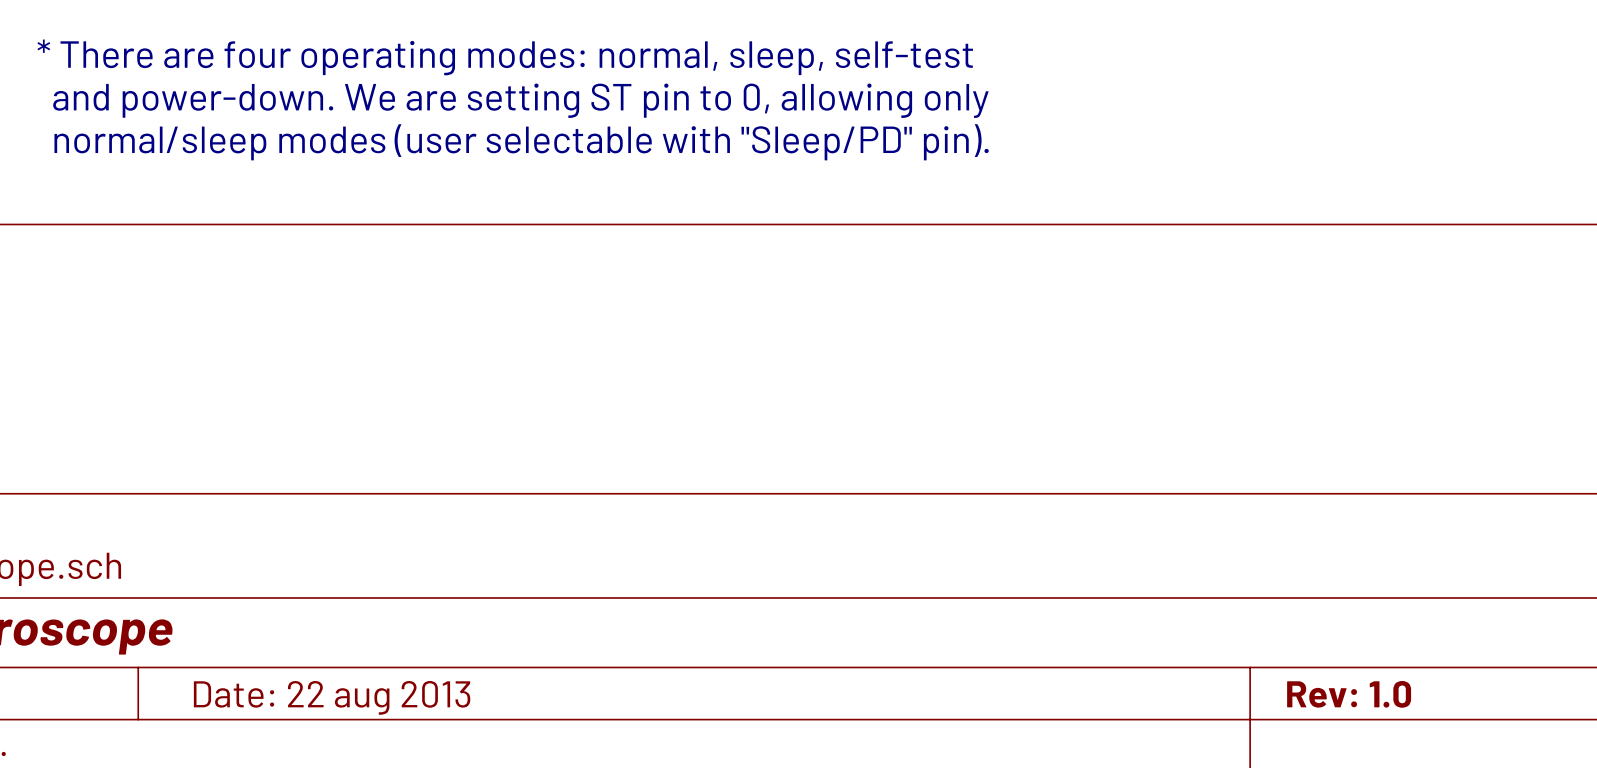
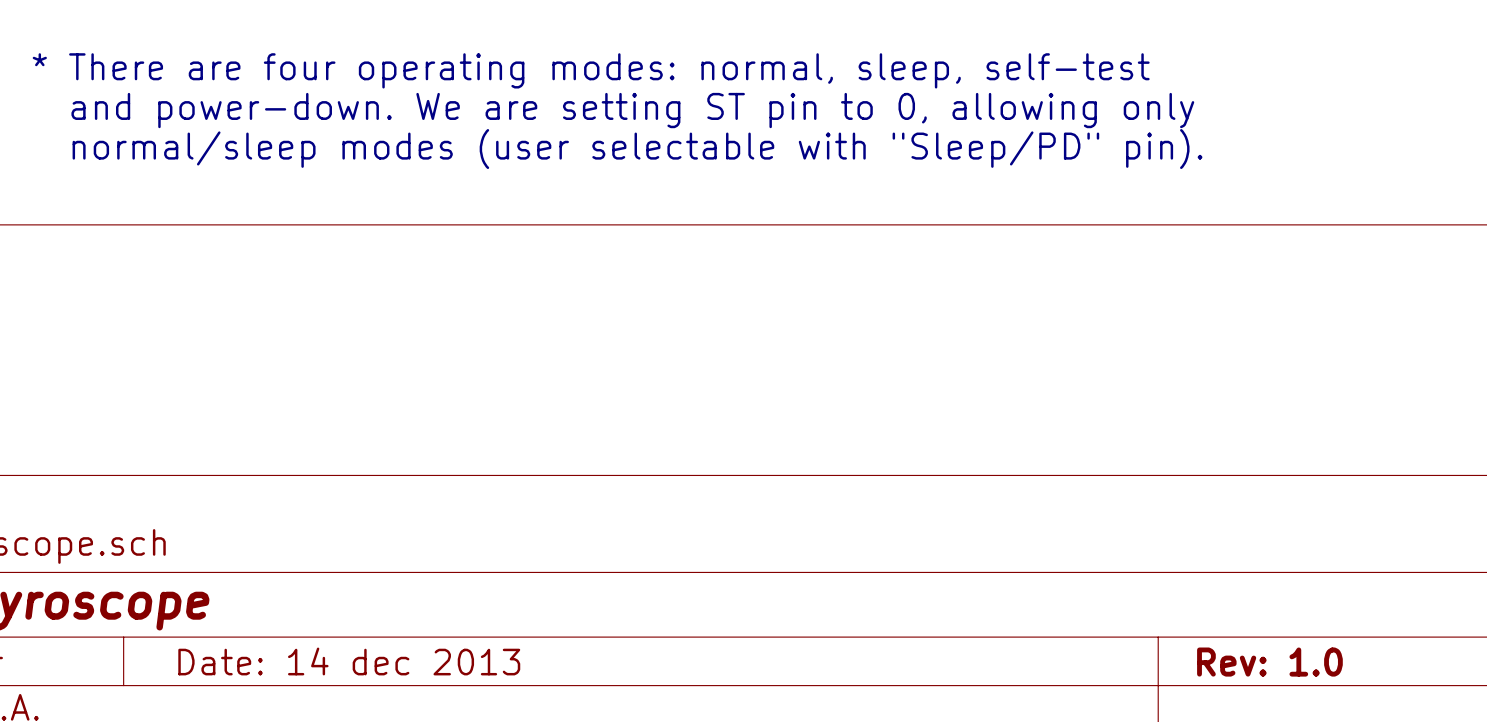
title block: Date: 22 aug 2013 (332, 697) -> Date: 14 dec 2013 (349, 661)

